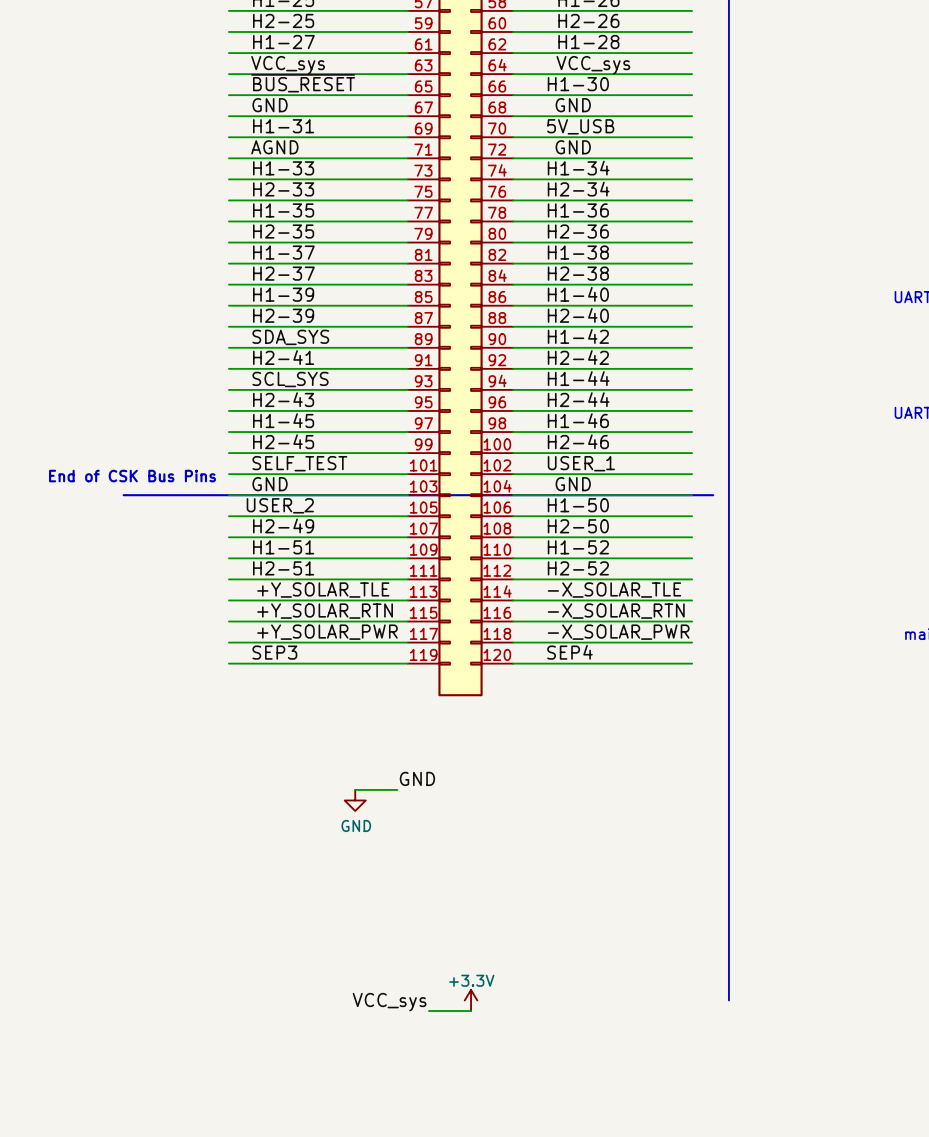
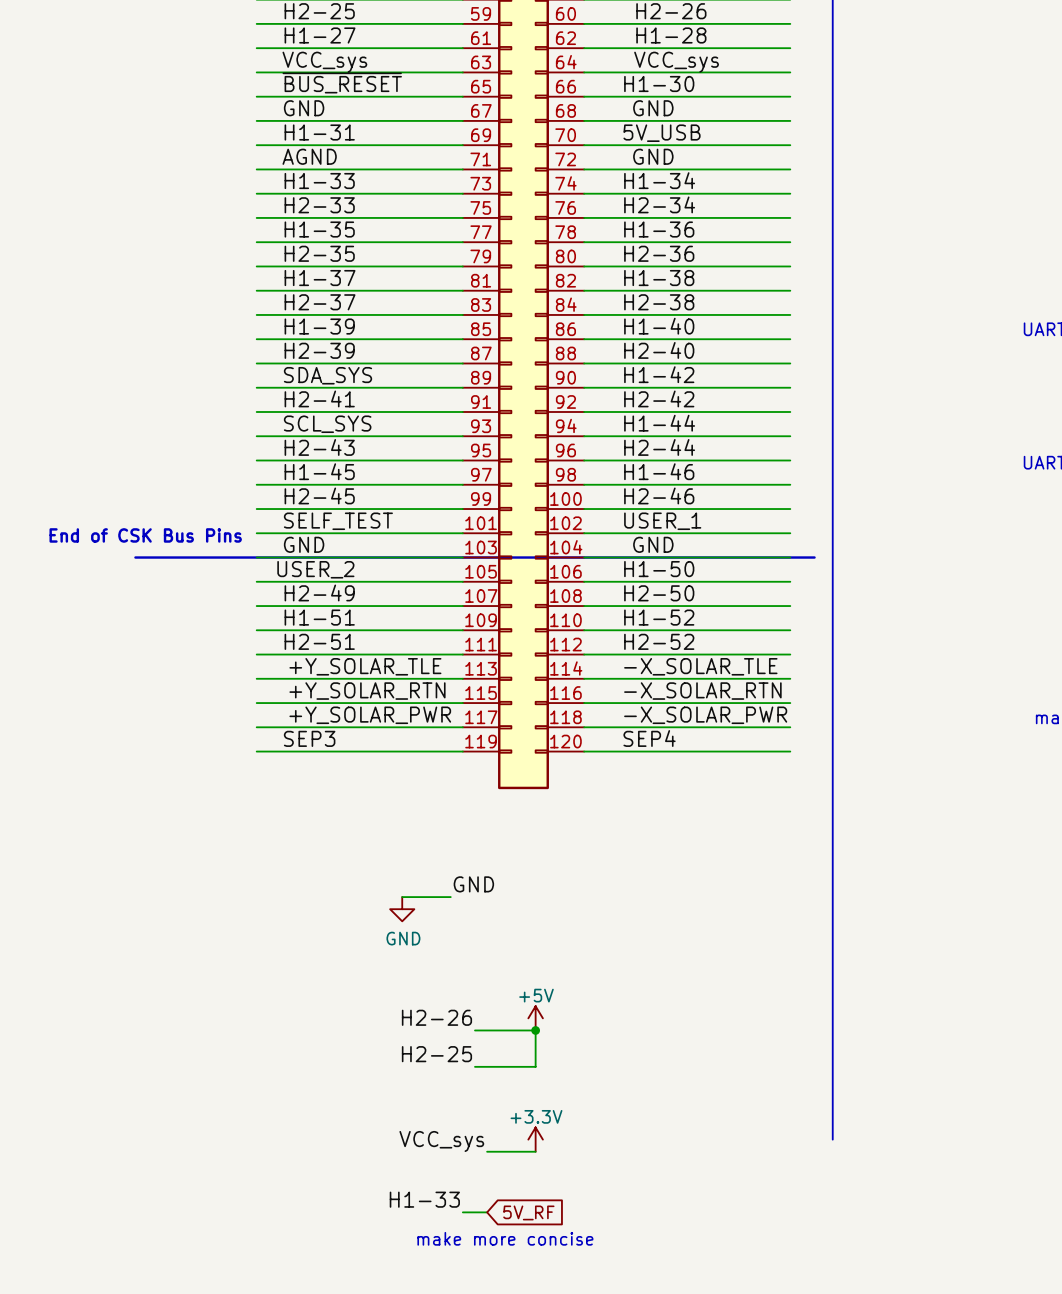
label: none -> H2-26 (436, 1017)
power symbol: none -> +5V (535, 1018)
wire: none -> (474, 1030) (535, 1030) (535, 1066) (474, 1066)
junction: none -> (535, 1030)
label: none -> H2-25 (436, 1054)
label: none -> H1-33 (424, 1199)
wire: none -> (462, 1212) (487, 1212)
global label: none -> 5V_RF (528, 1212)
text: none -> make more concise (505, 1238)

